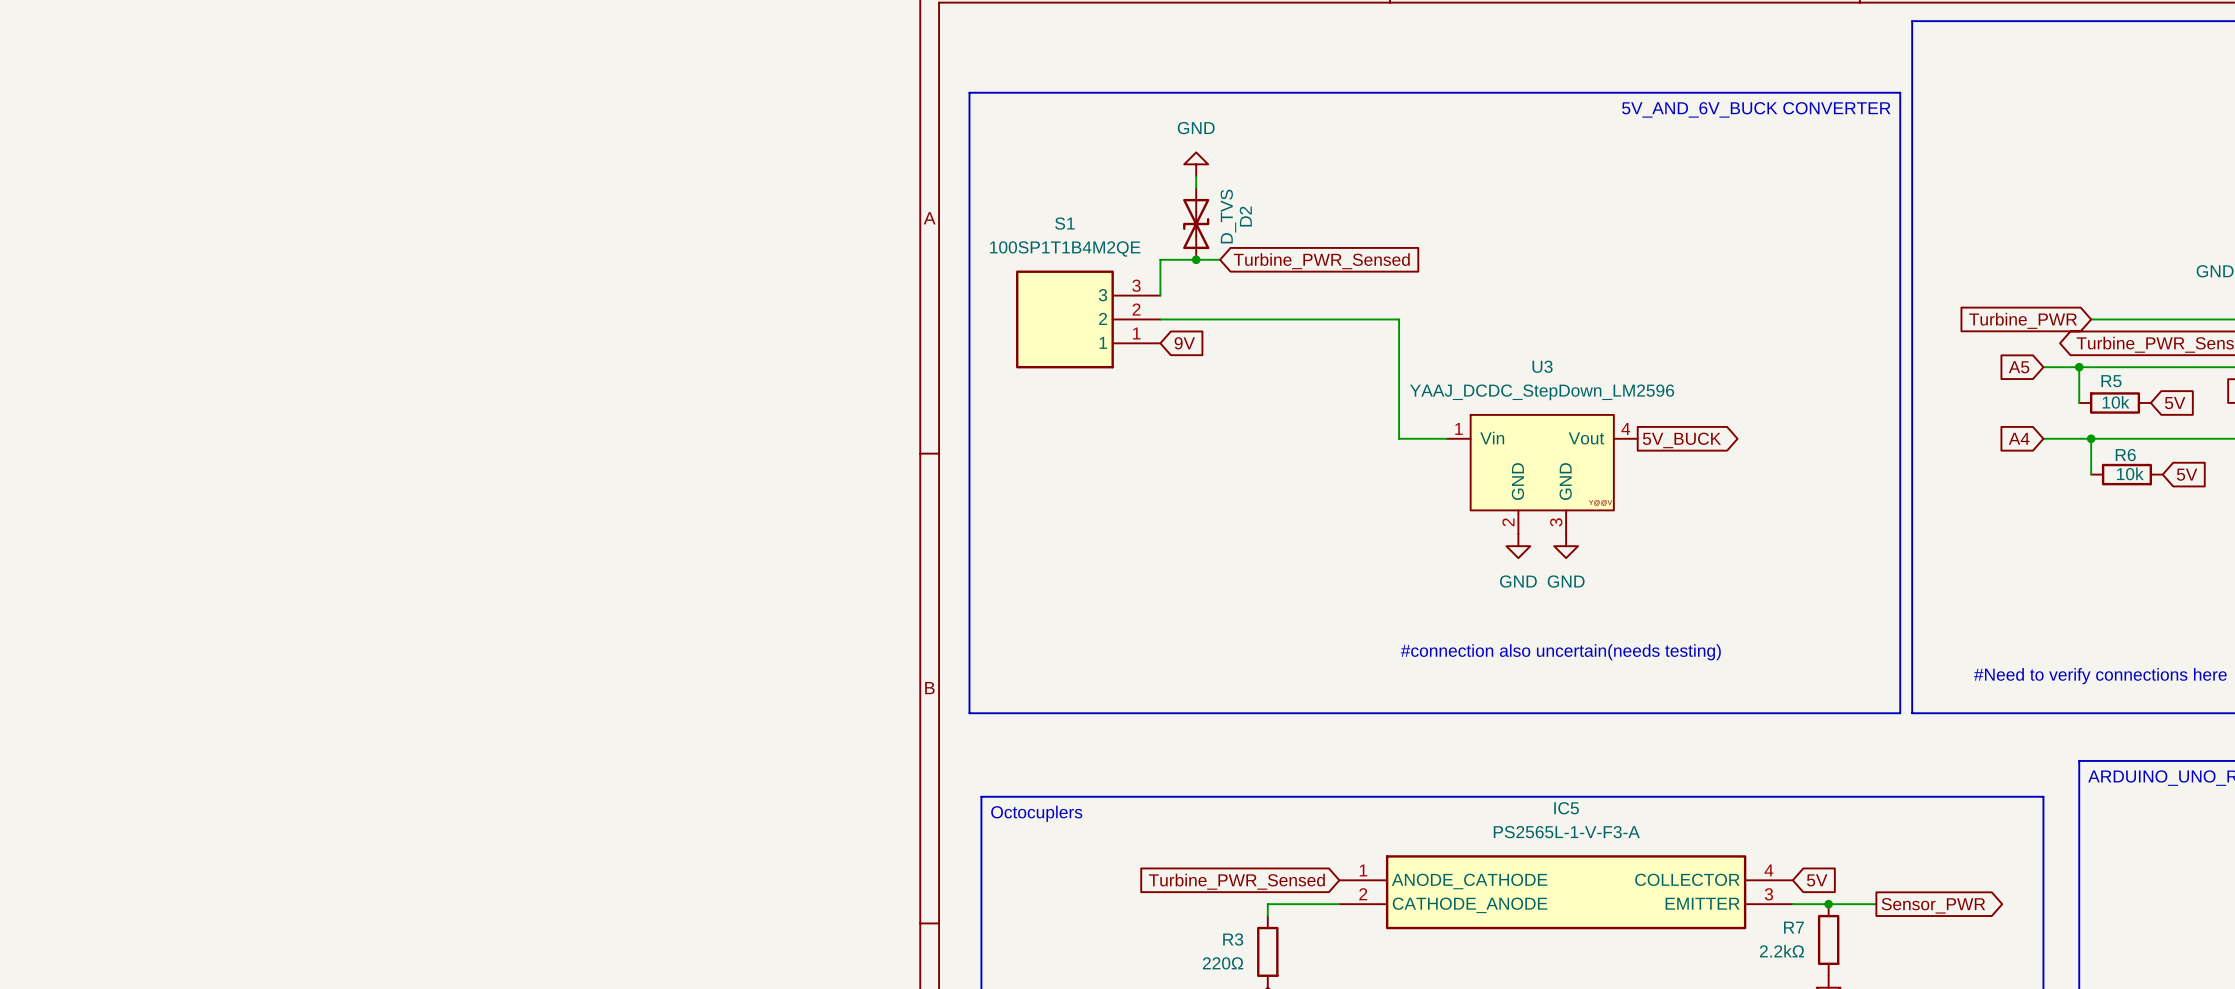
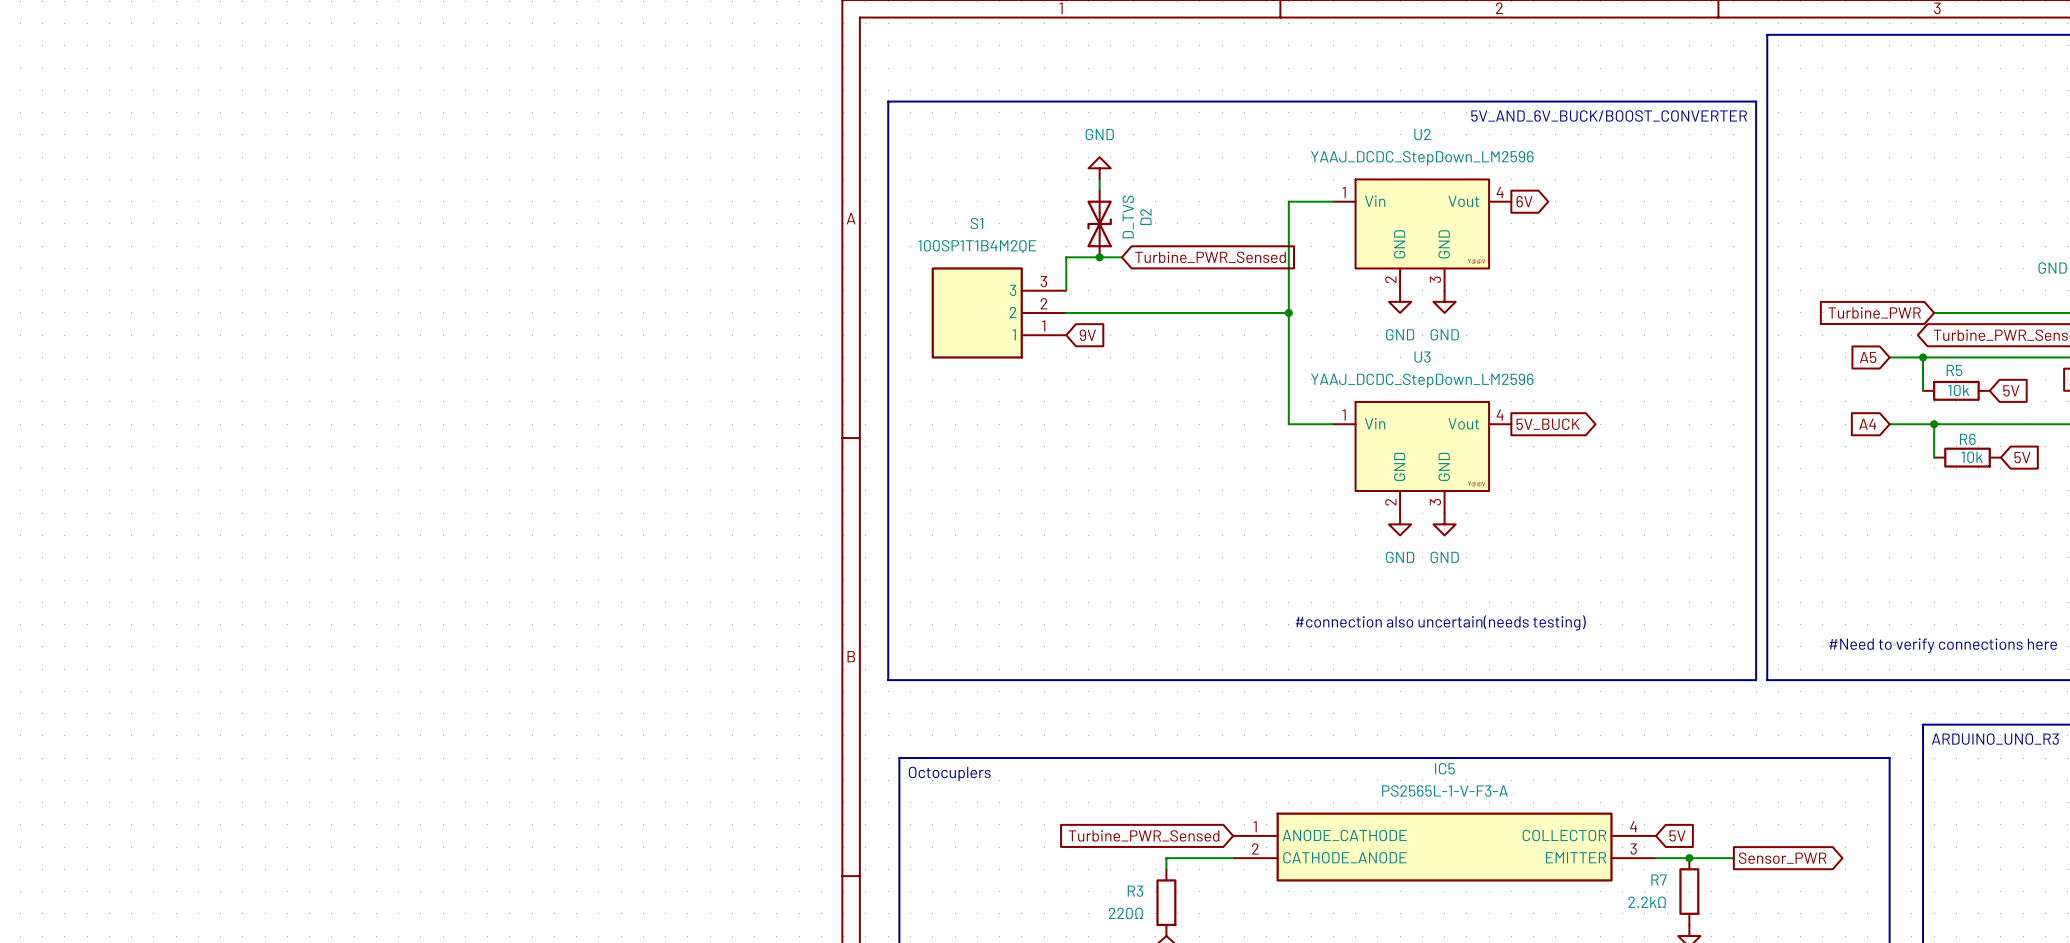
text: 5V_AND_6V_BUCK CONVERTER (1756, 109) -> 5V_AND_6V_BUCK/BOOST_CONVERTER (1609, 116)
wire: none -> (1333, 201) (1288, 201) (1288, 312)
global label: none -> 6V (1524, 201)
U2: none -> YAAJ_DCDC_StepDown_LM2596 (1422, 235)
power symbol: none -> GND (1400, 301)
power symbol: none -> GND (1444, 301)
junction: none -> (1288, 312)

